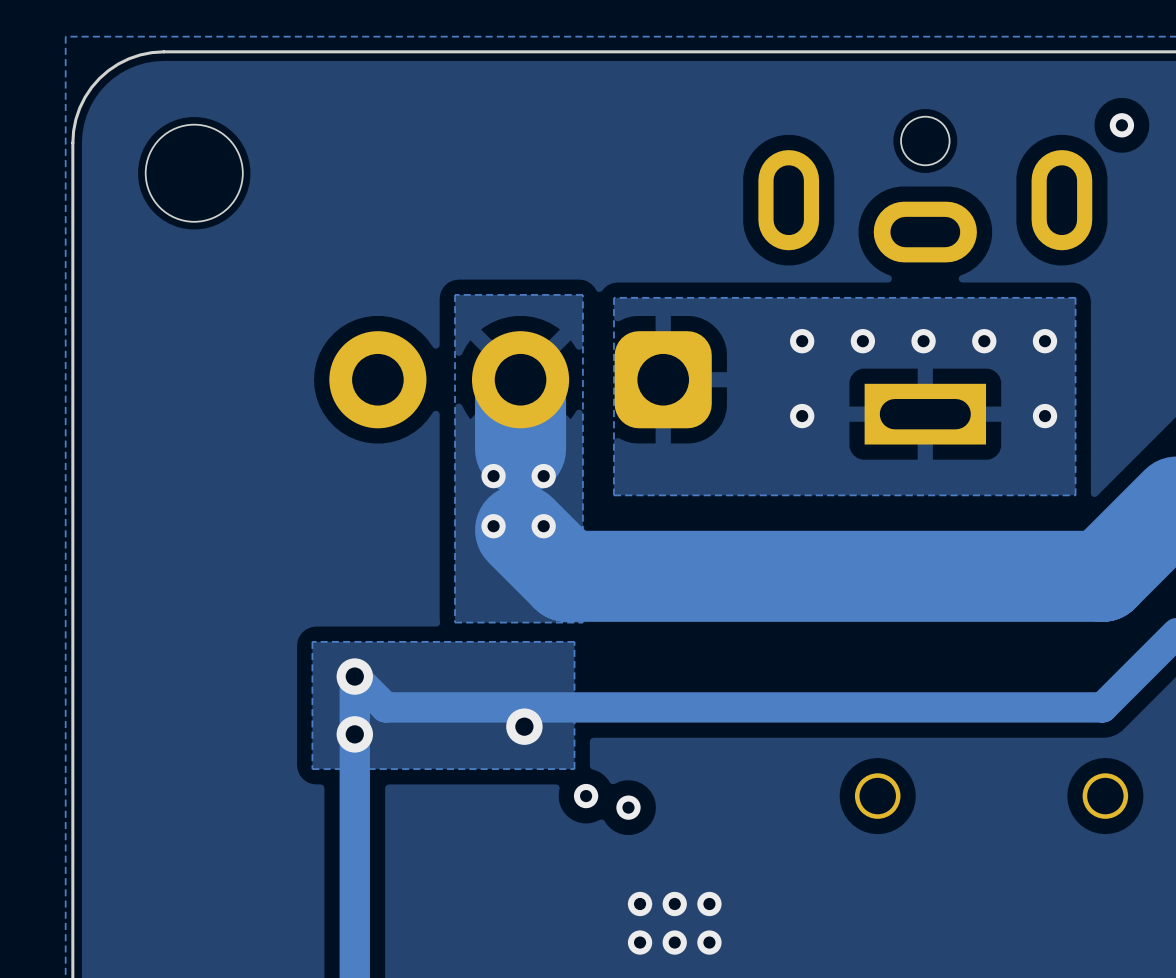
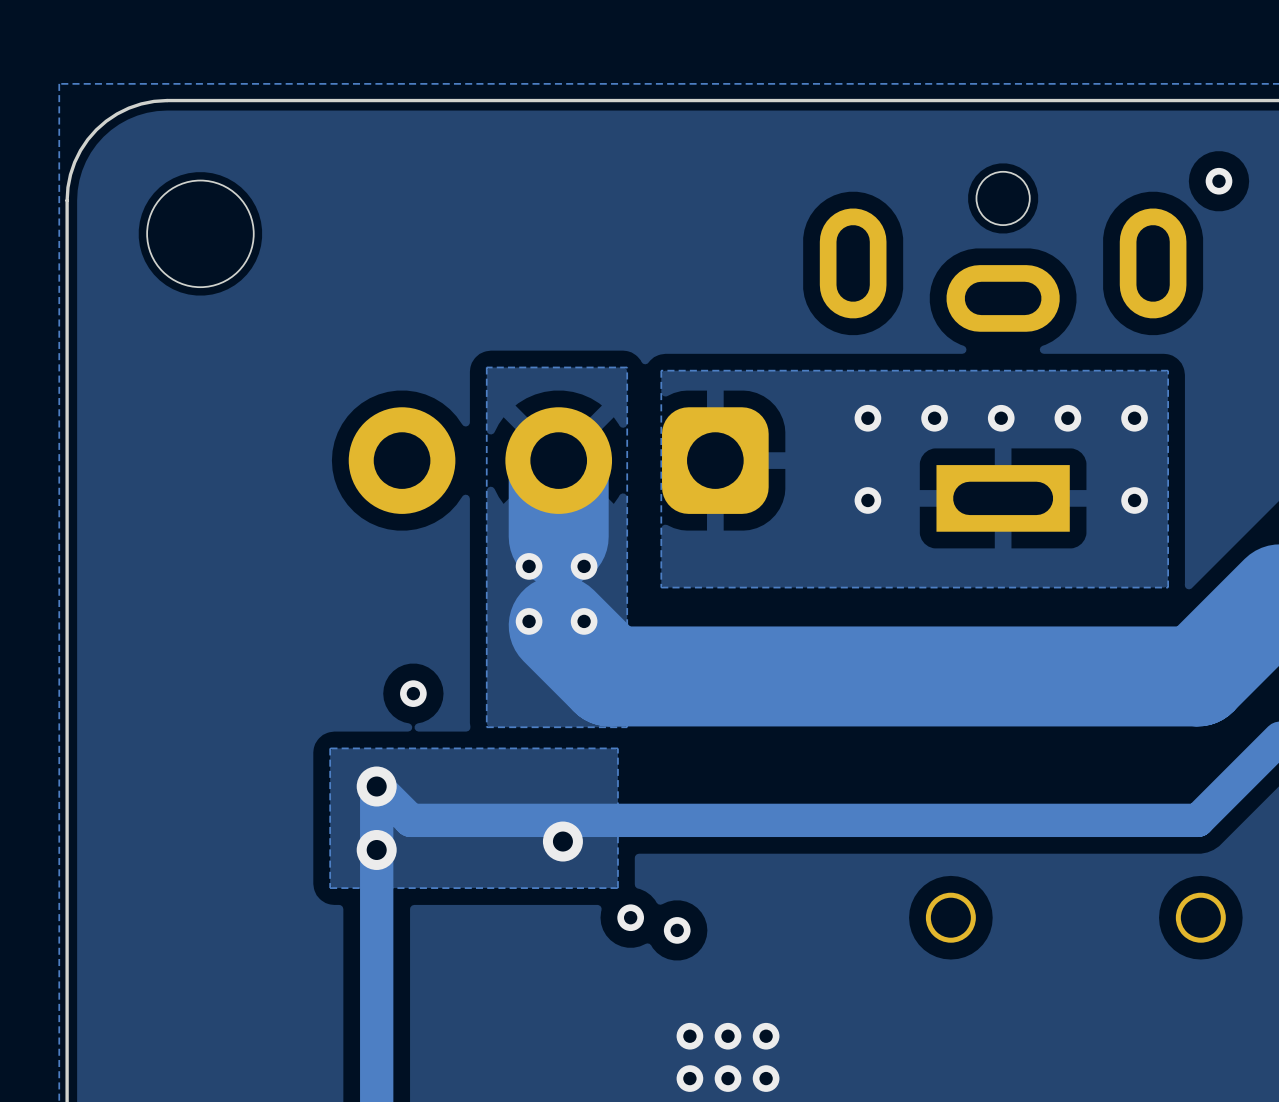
via: none -> (413, 693)

